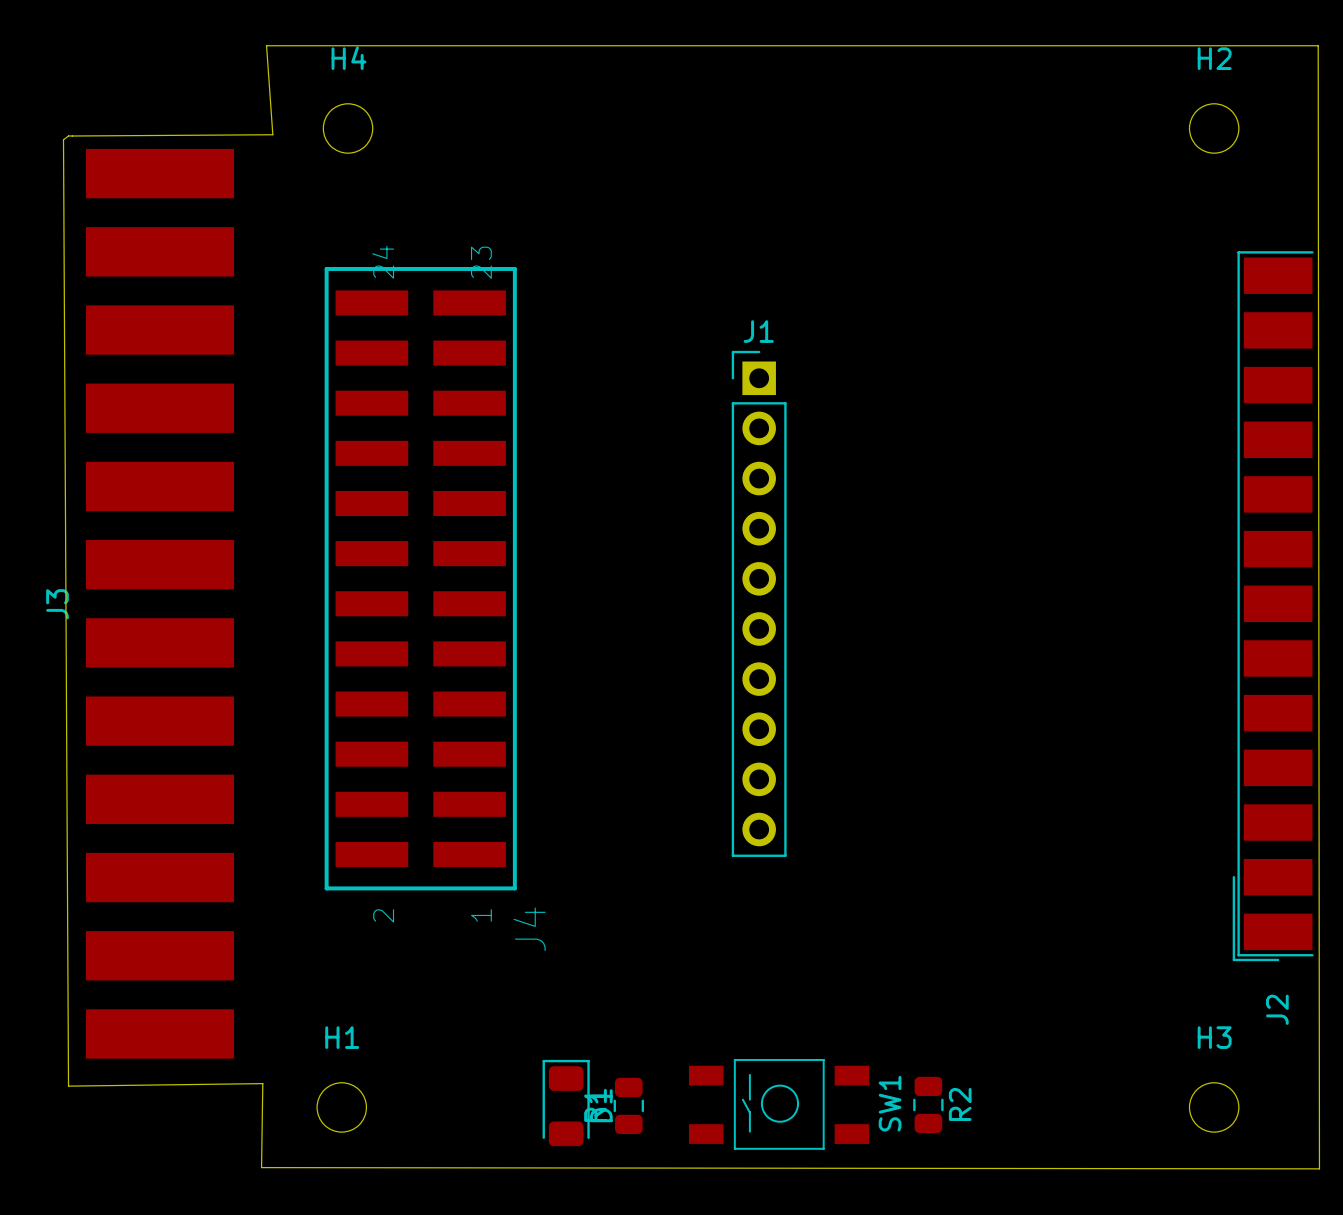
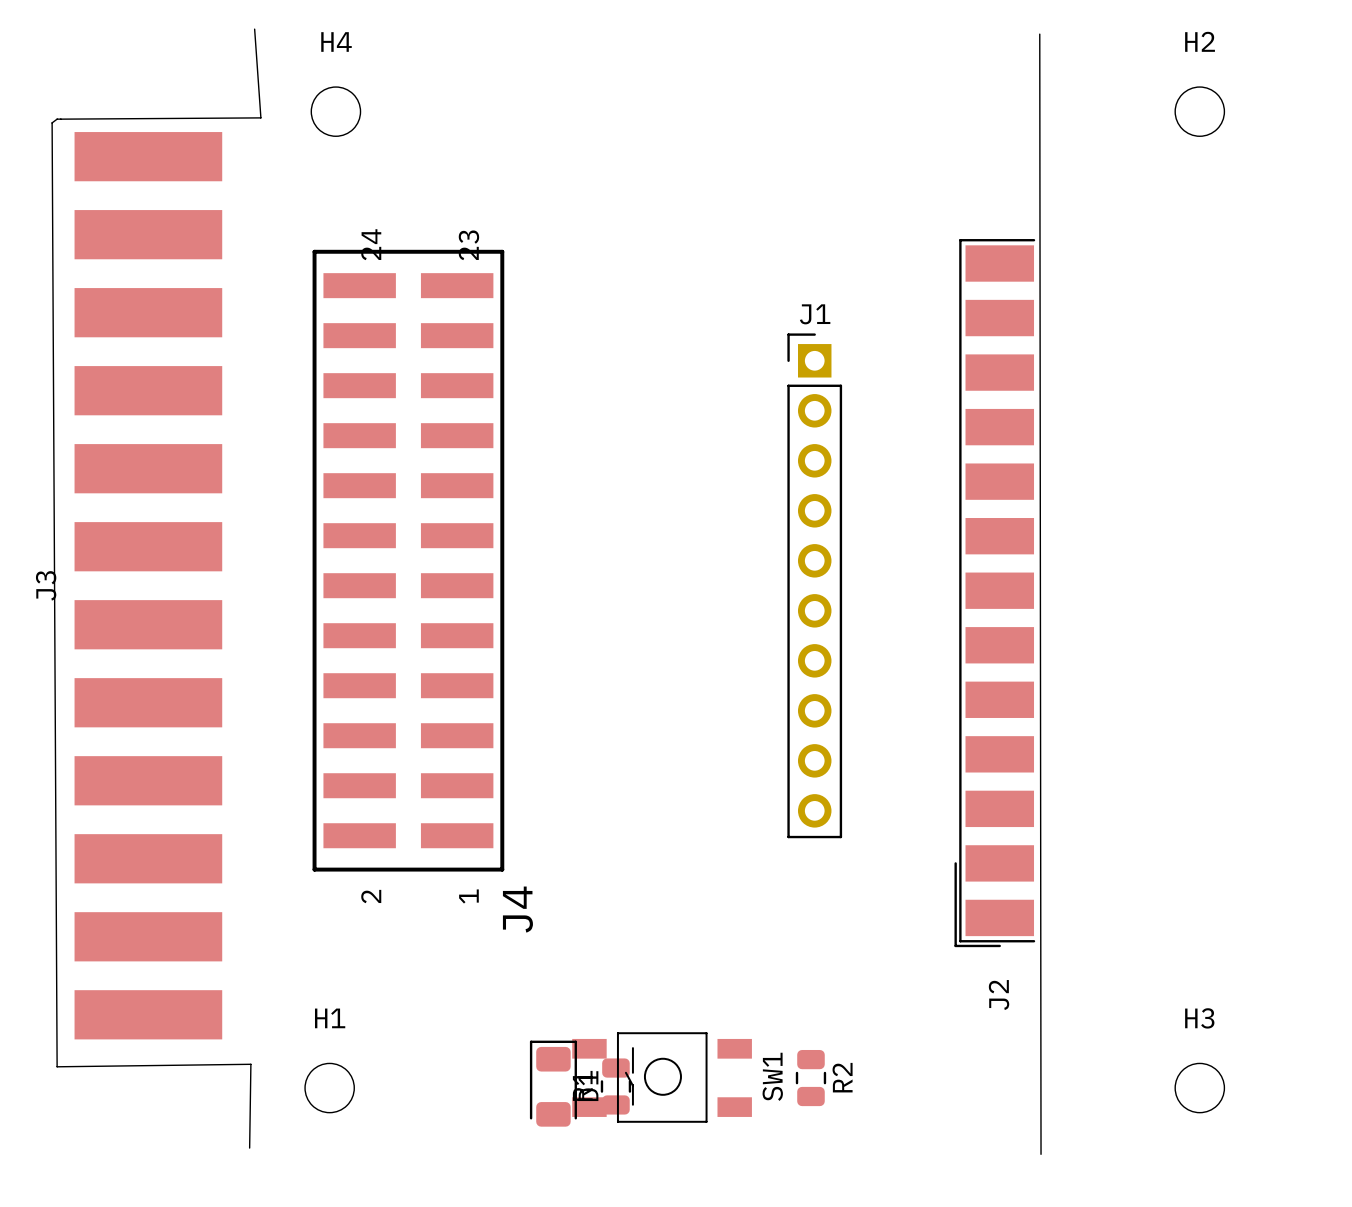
board edge: (266, 45) (1318, 45) (1319, 1168) (261, 1167) -> none
board edge: none -> (1039, 34) (1041, 1154)
J1 position: (759, 603) -> (814, 585)
J2 position: (1273, 606) -> (994, 593)
SW1 position: (779, 1104) -> (662, 1077)
R2 position: (928, 1104) -> (810, 1078)

